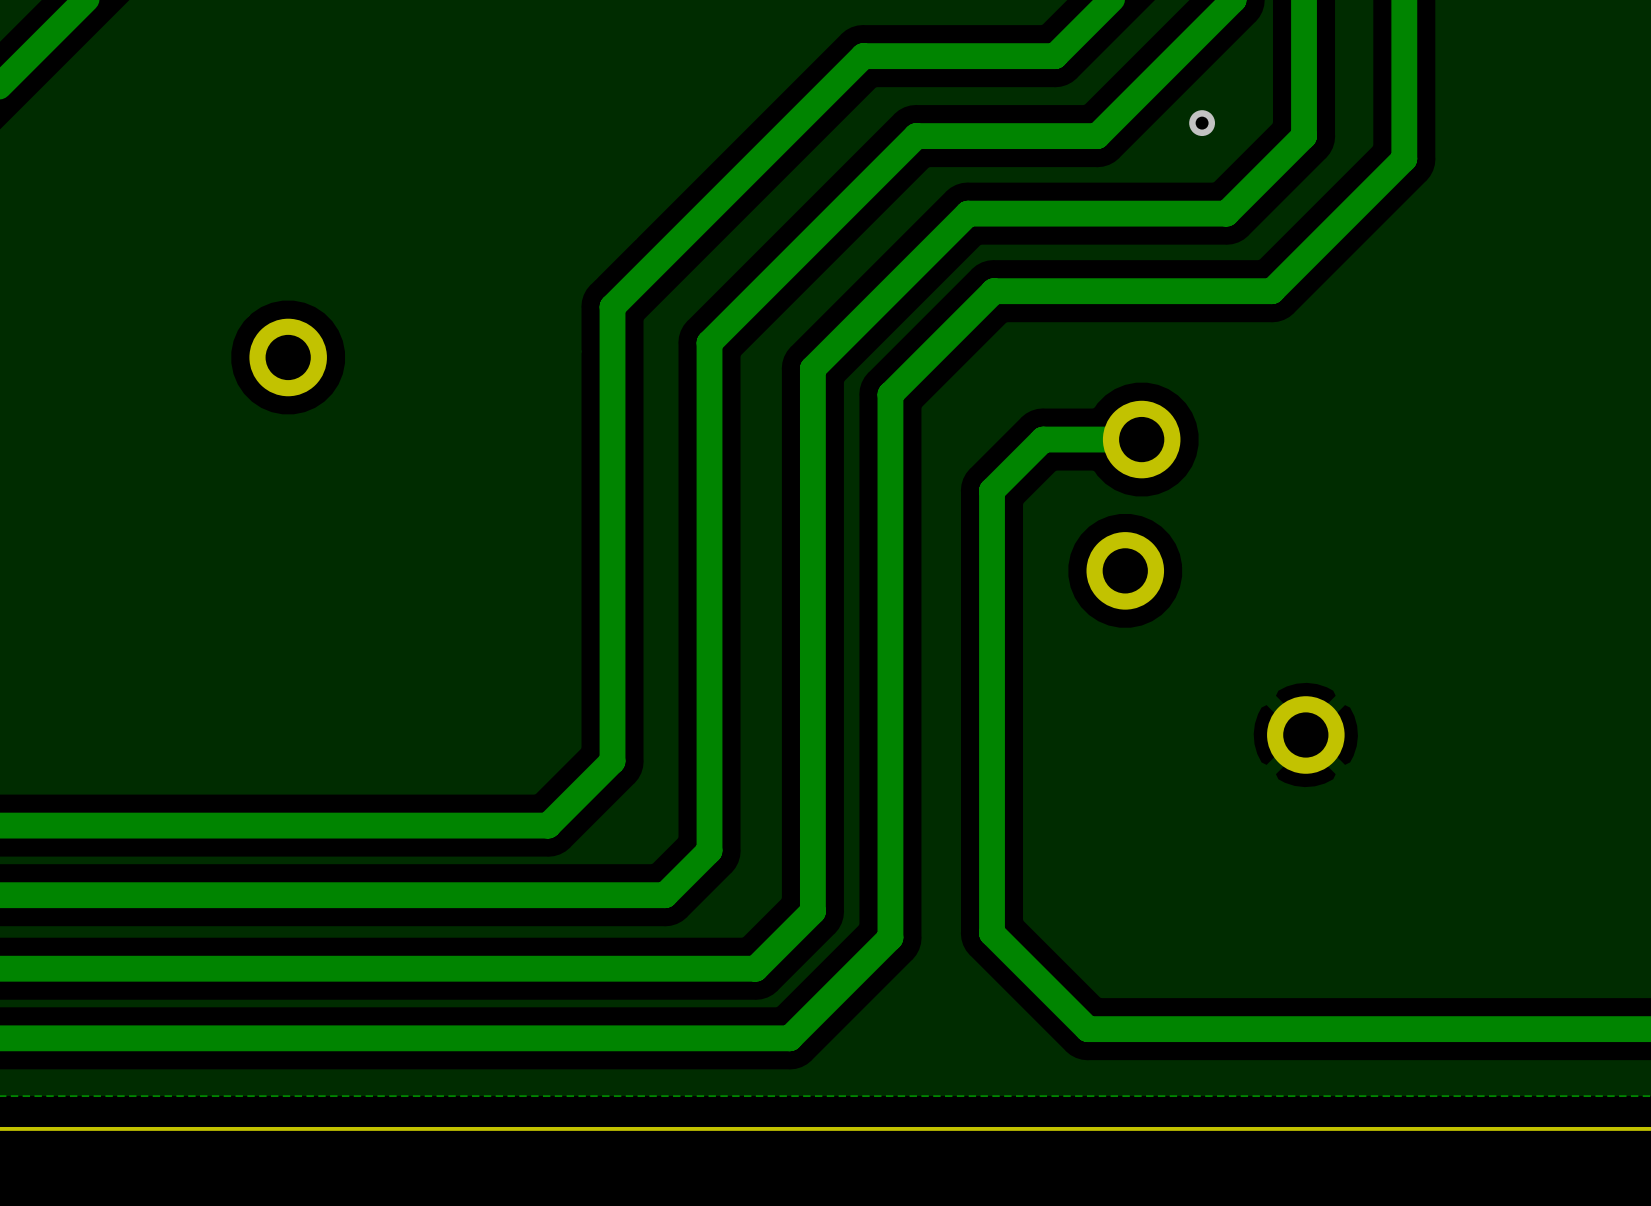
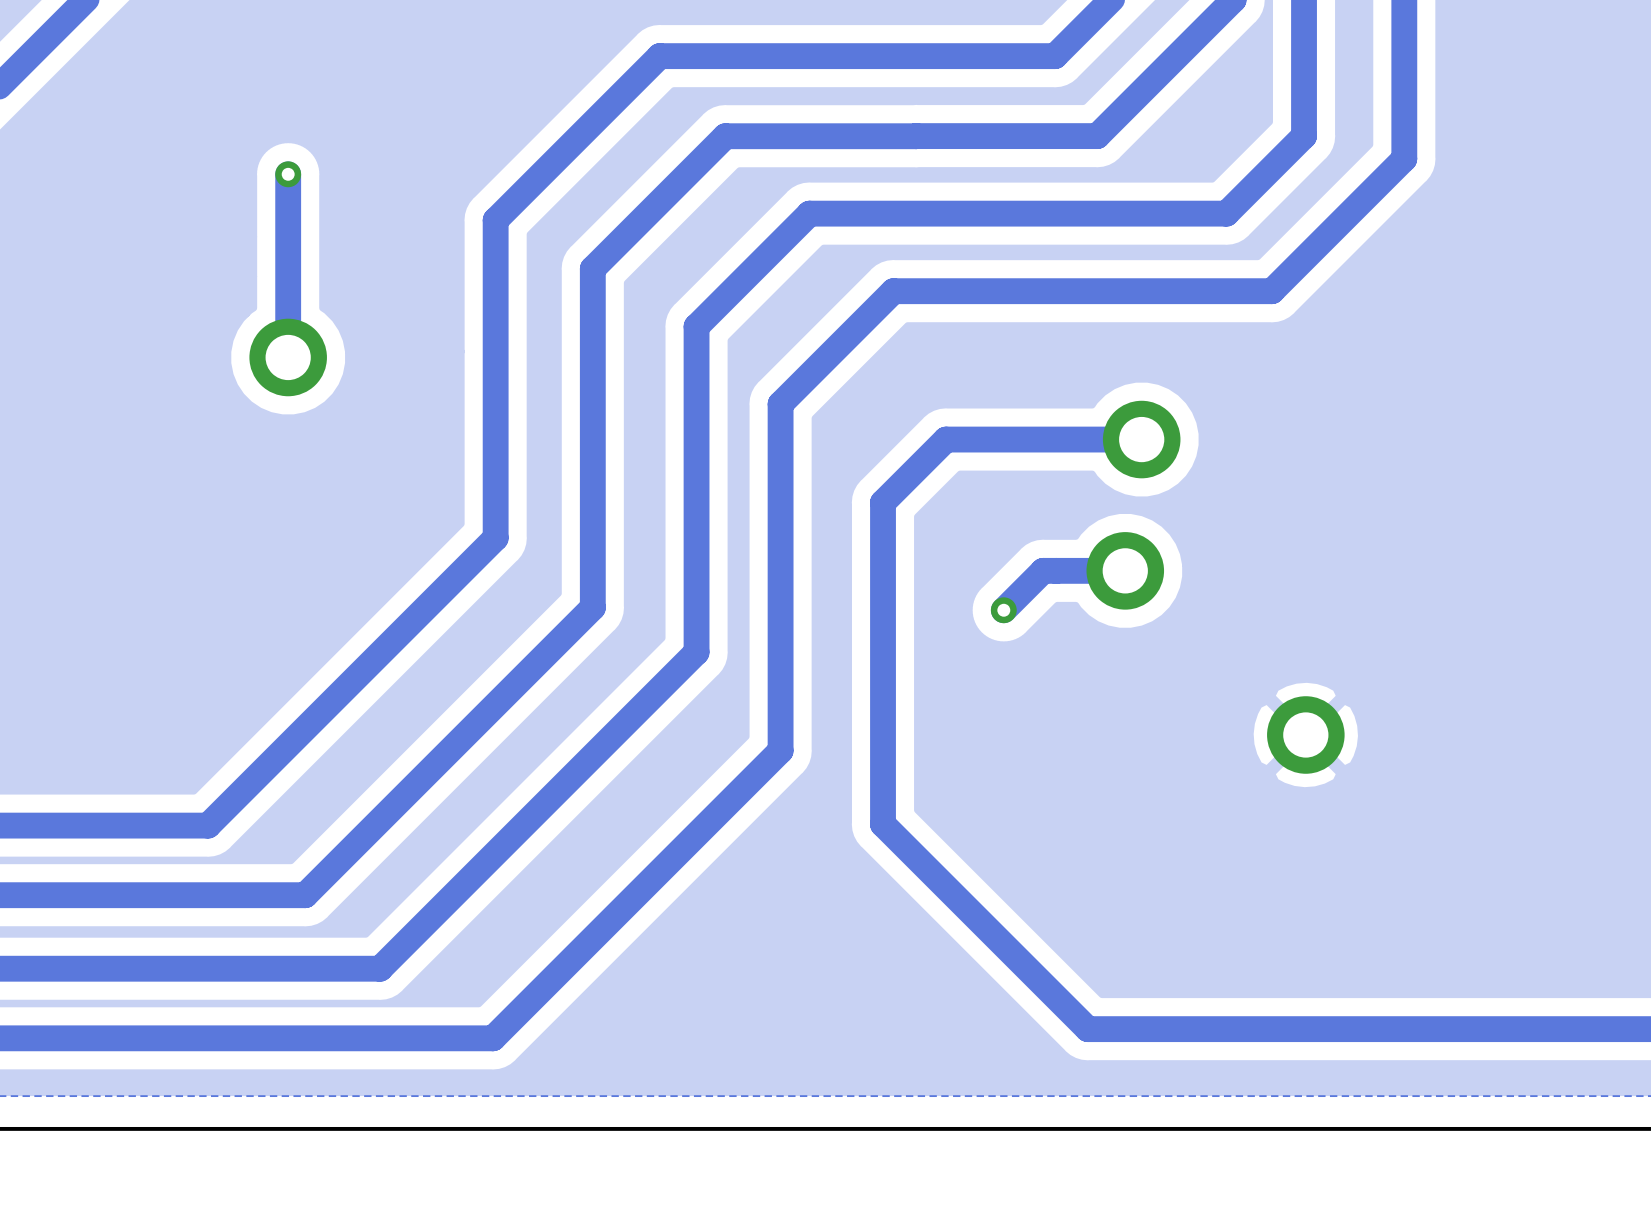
track: (863, 56) (612, 306) (612, 761) (548, 825) (208, 825) -> (863, 56) (659, 56) (495, 220) (495, 538) (208, 825)
via: (1202, 123) -> none
track: (916, 136) (709, 342) (709, 850) (665, 895) (305, 895) -> (916, 136) (725, 136) (592, 268) (592, 607) (305, 895)
track: none -> (288, 174) (288, 357)
via: none -> (288, 174)
track: (967, 213) (812, 368) (812, 911) (755, 968) (380, 968) -> (967, 213) (809, 213) (696, 326) (696, 652) (380, 968)
track: (993, 291) (890, 394) (890, 937) (789, 1038) (493, 1038) -> (993, 291) (893, 291) (780, 404) (780, 750) (493, 1038)
track: (1043, 439) (992, 490) (992, 933) -> (1043, 439) (946, 439) (883, 502) (883, 824) (992, 933)
track: none -> (1125, 570) (1043, 570) (1003, 610)
via: none -> (1003, 610)

